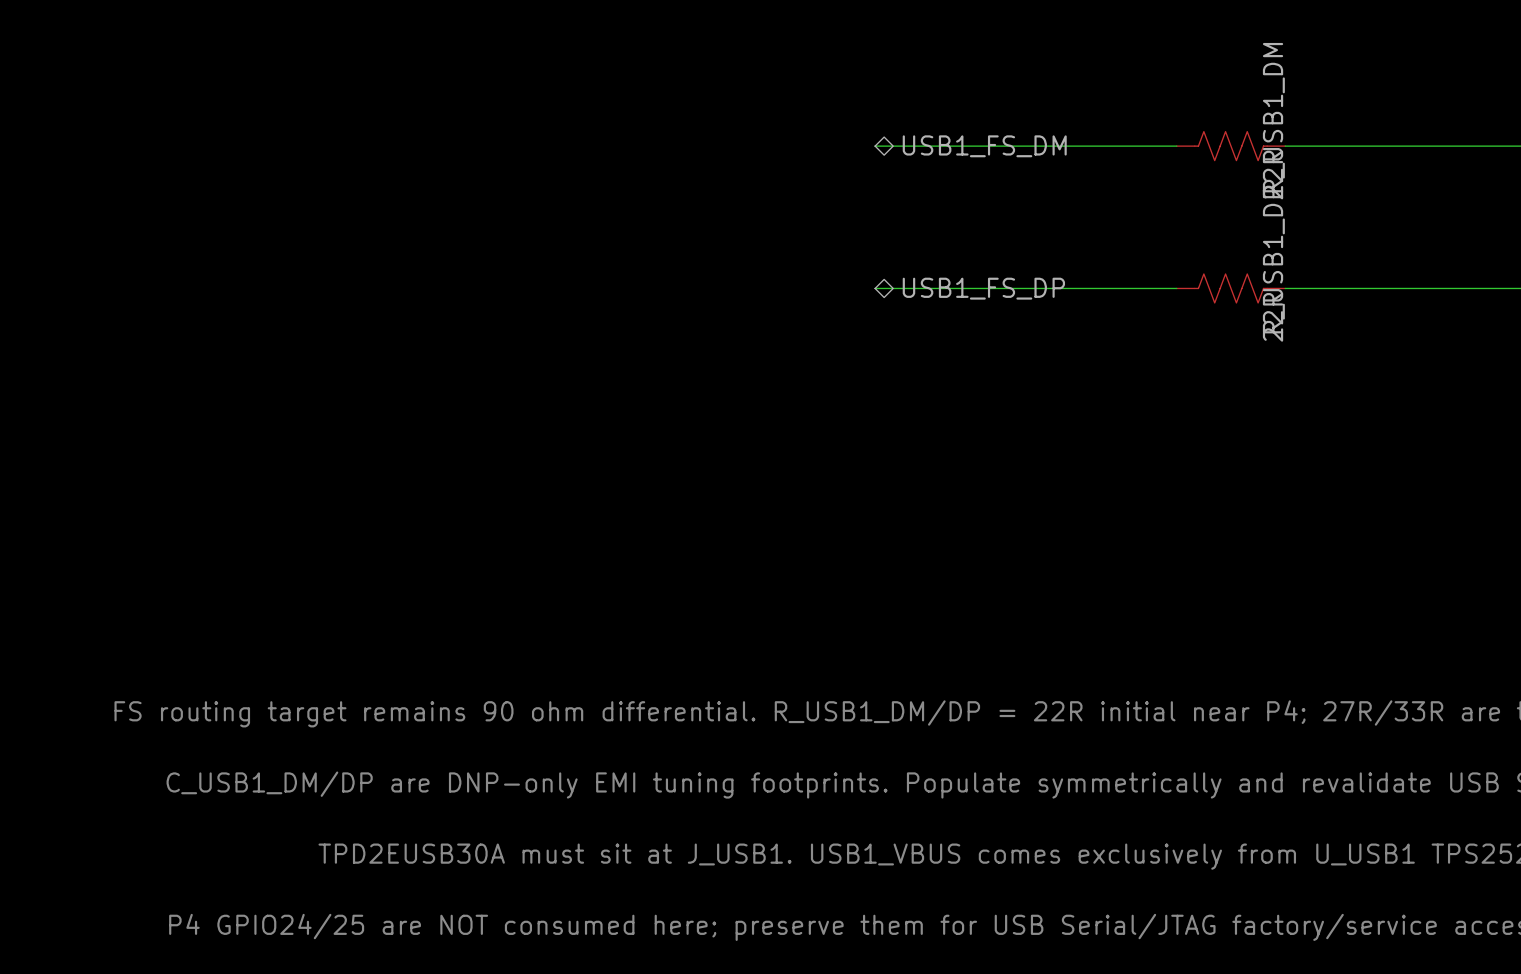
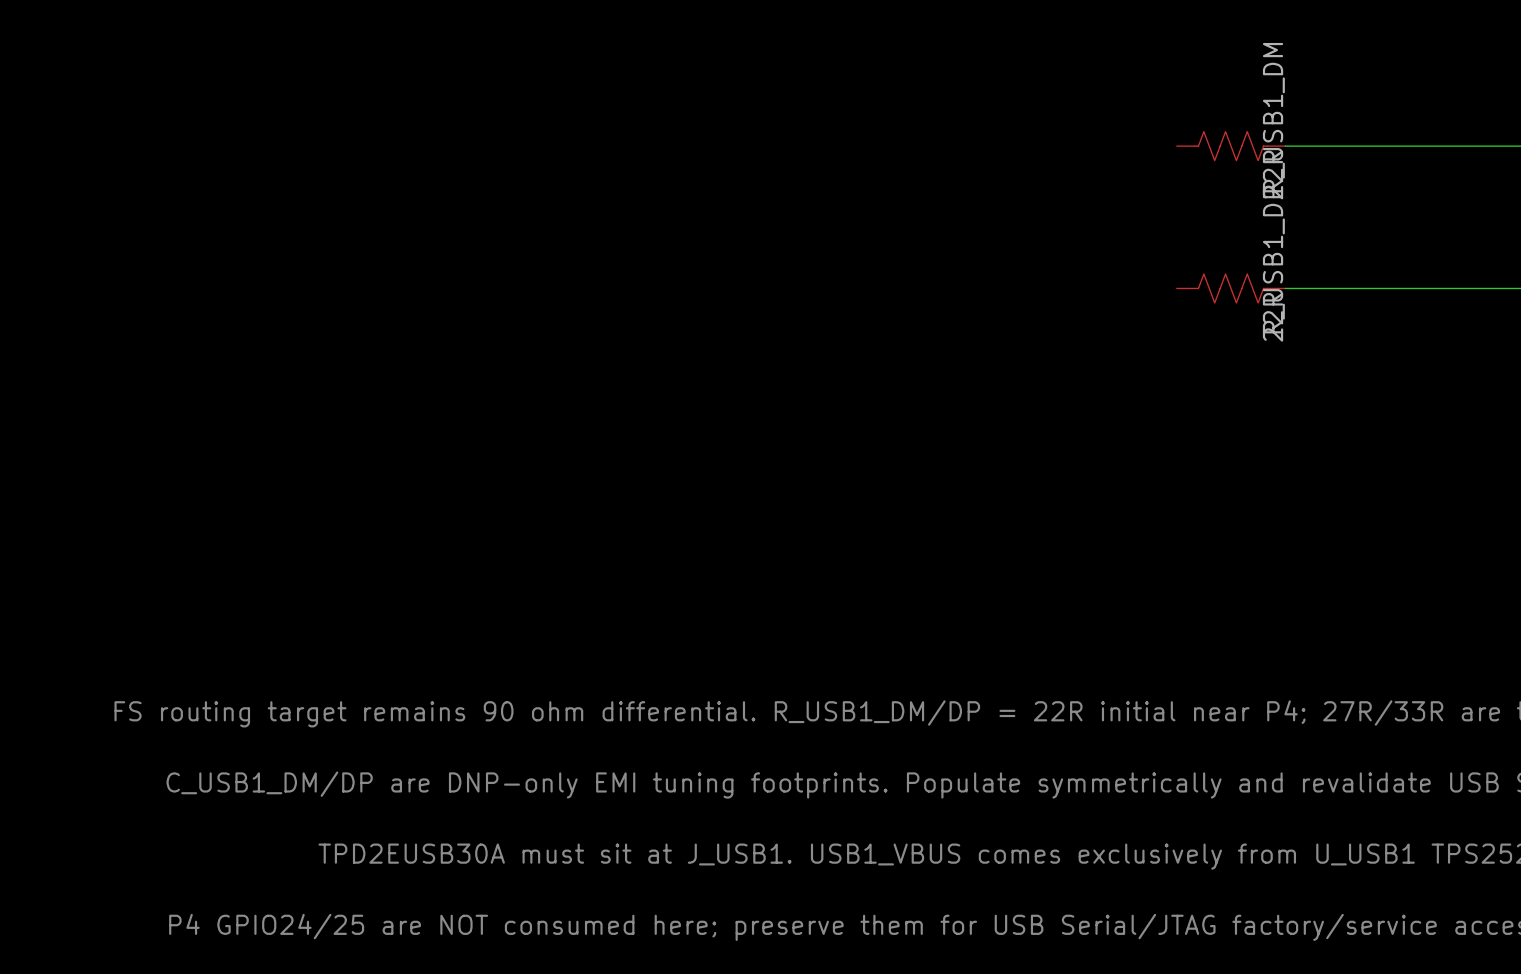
wire: (875, 146) (1176, 146) -> none
hierarchical label: USB1_FS_DM (984, 146) -> none
wire: (875, 288) (1176, 288) -> none
hierarchical label: USB1_FS_DP (983, 288) -> none

